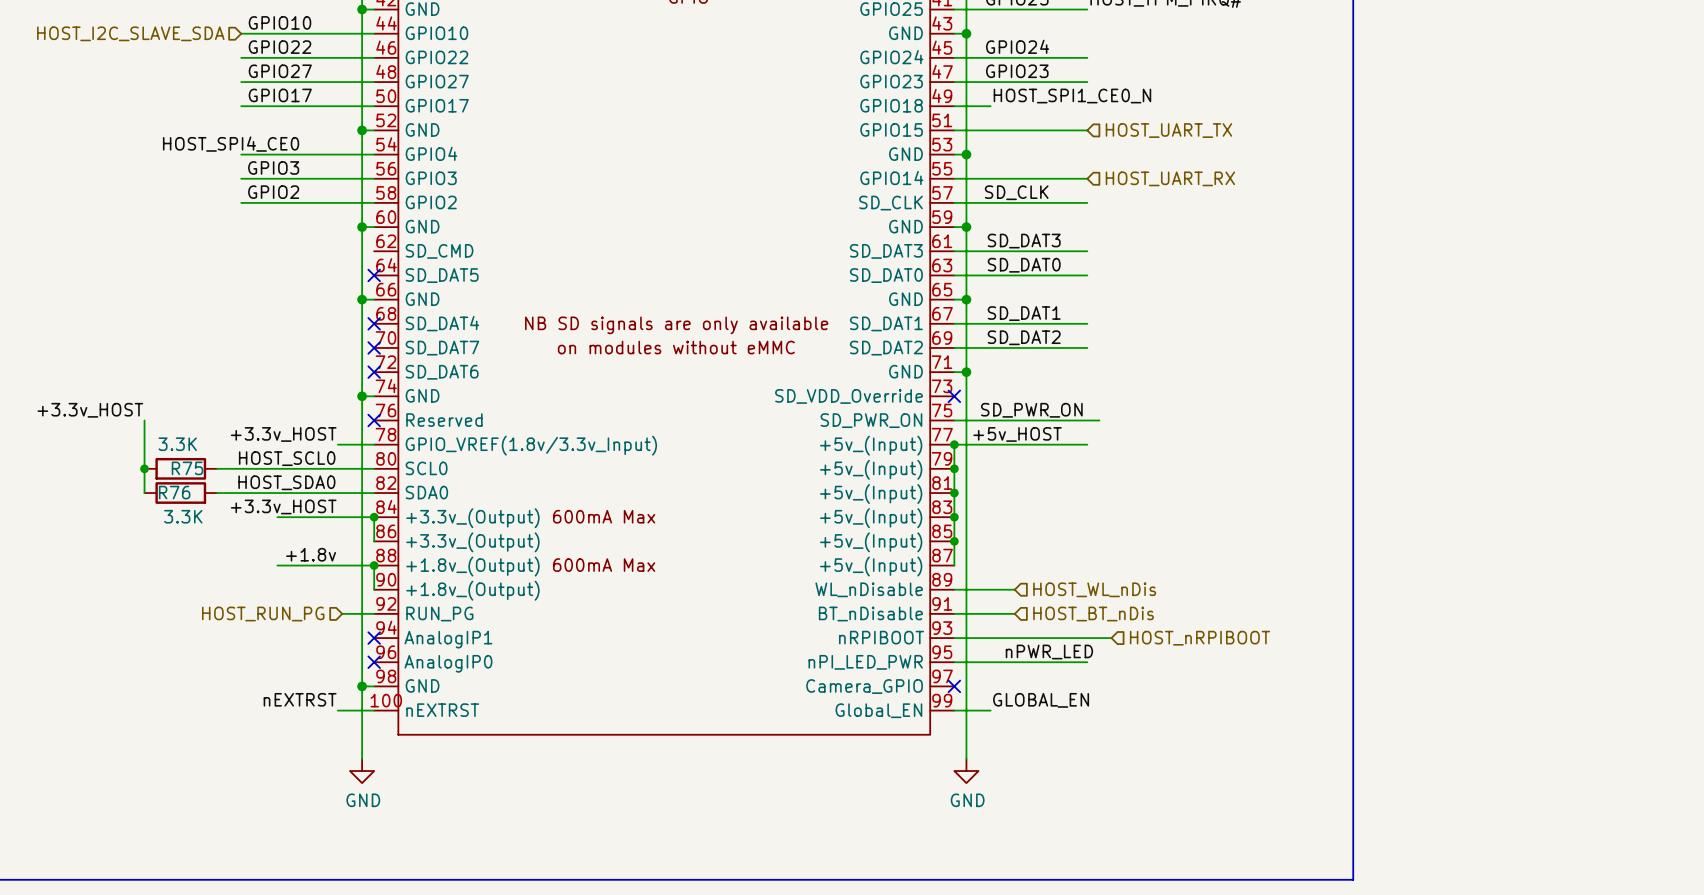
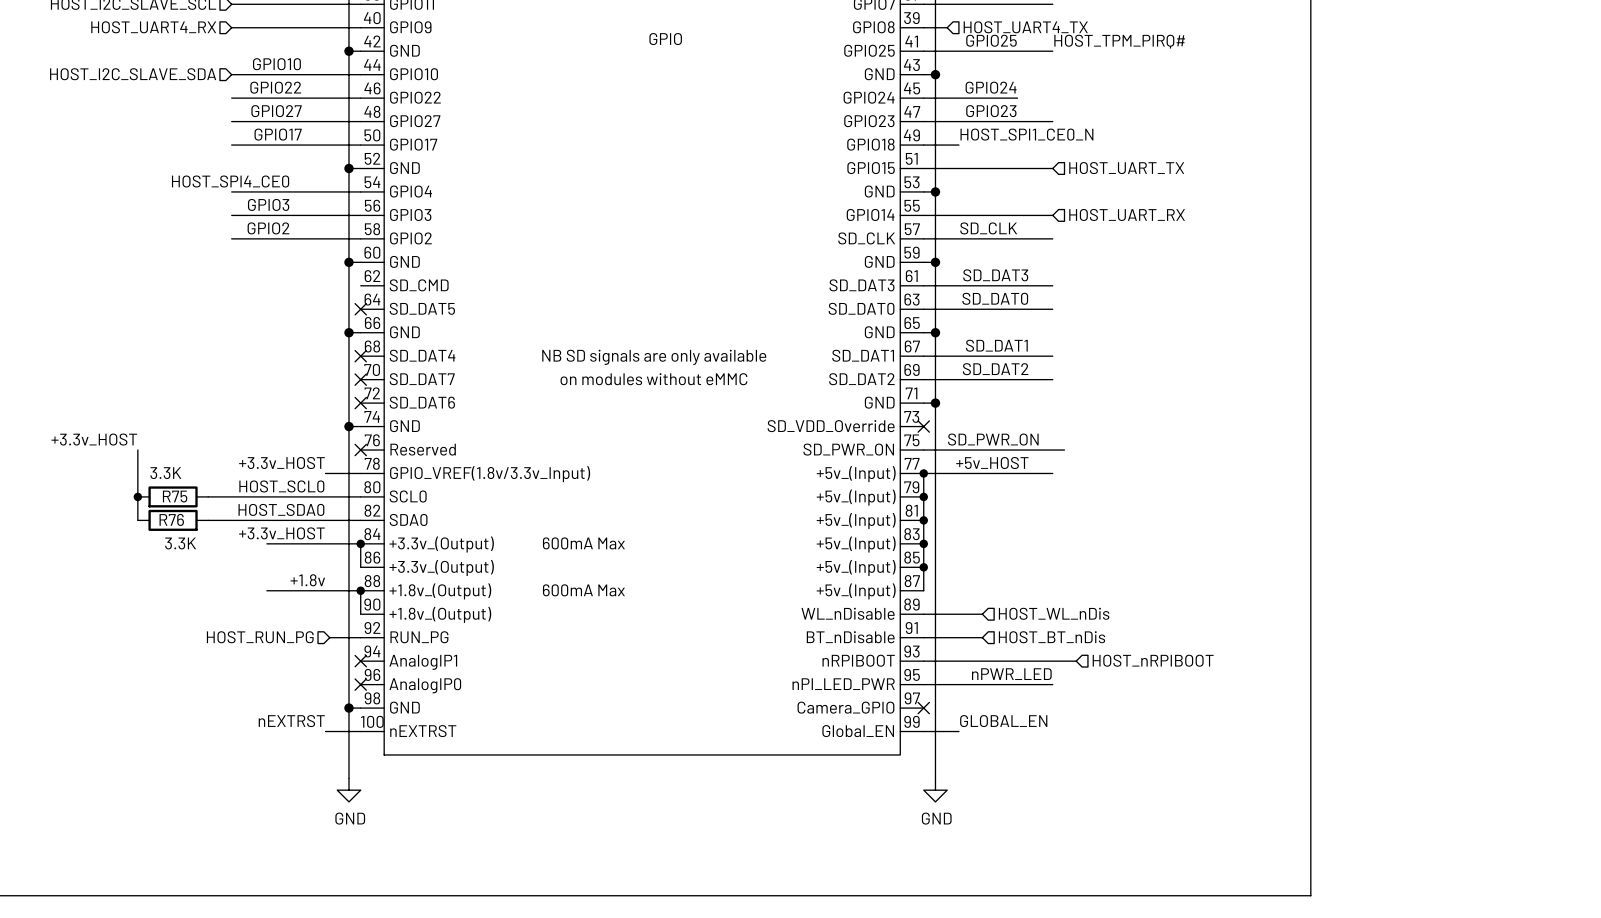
wire: (1051, 57) (1087, 57) -> none

